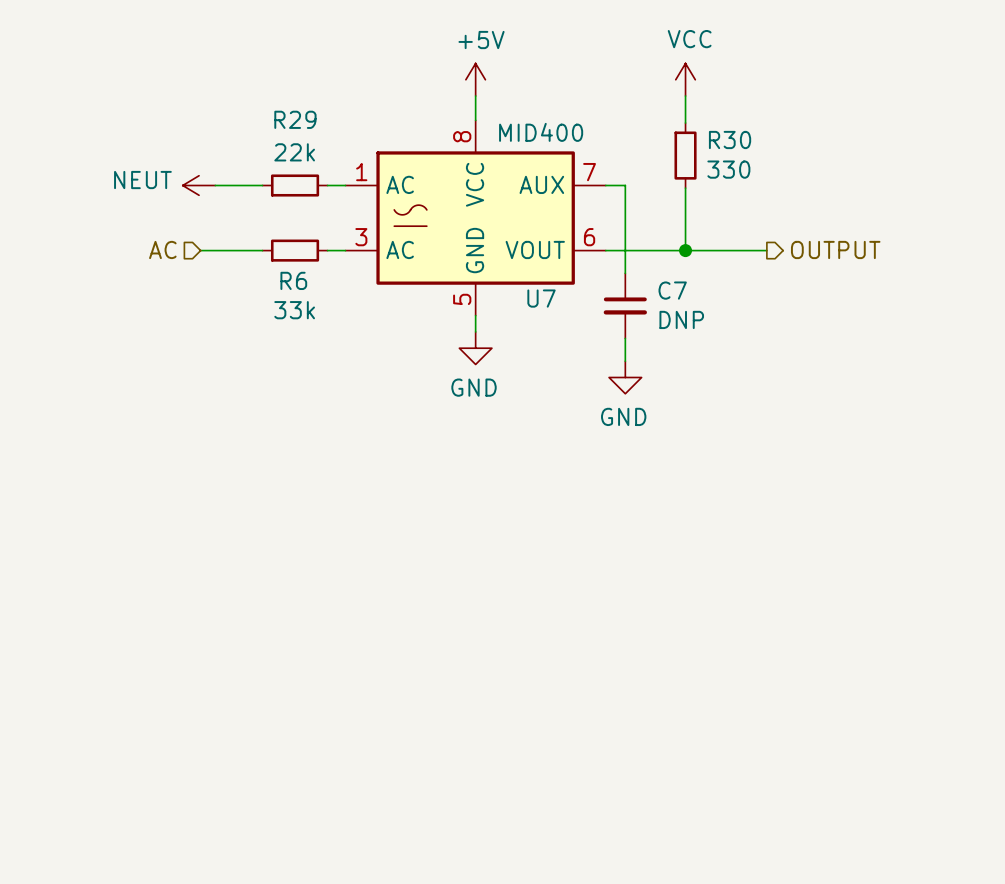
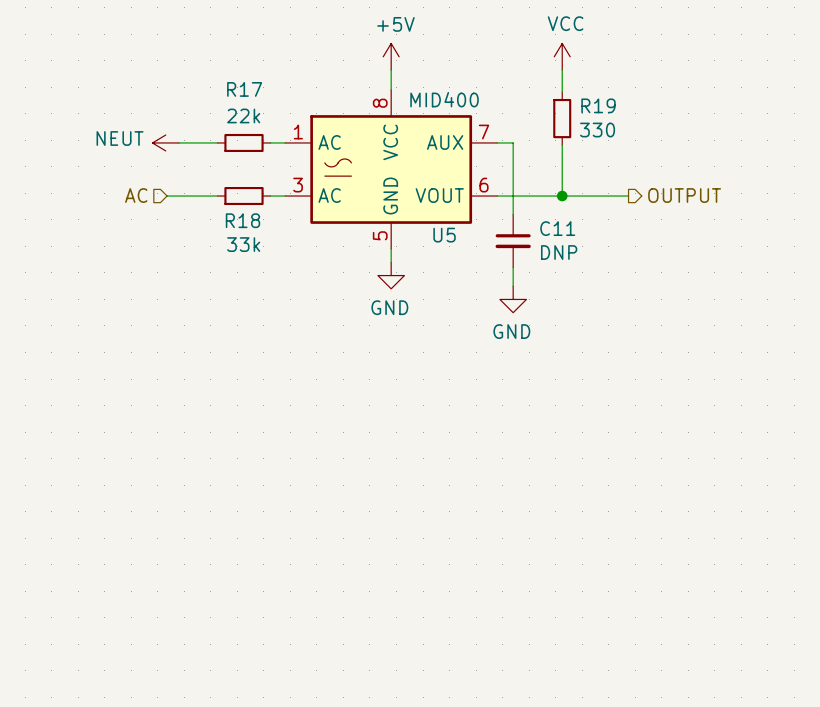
R29 name: R29 (295, 119) -> R17 (244, 89)
R30 name: R30 (730, 139) -> R19 (598, 105)
R6 name: R6 (293, 280) -> R18 (242, 220)
C7 name: C7 (672, 290) -> C11 (557, 228)
U7 name: U7 (541, 298) -> U5 (444, 235)

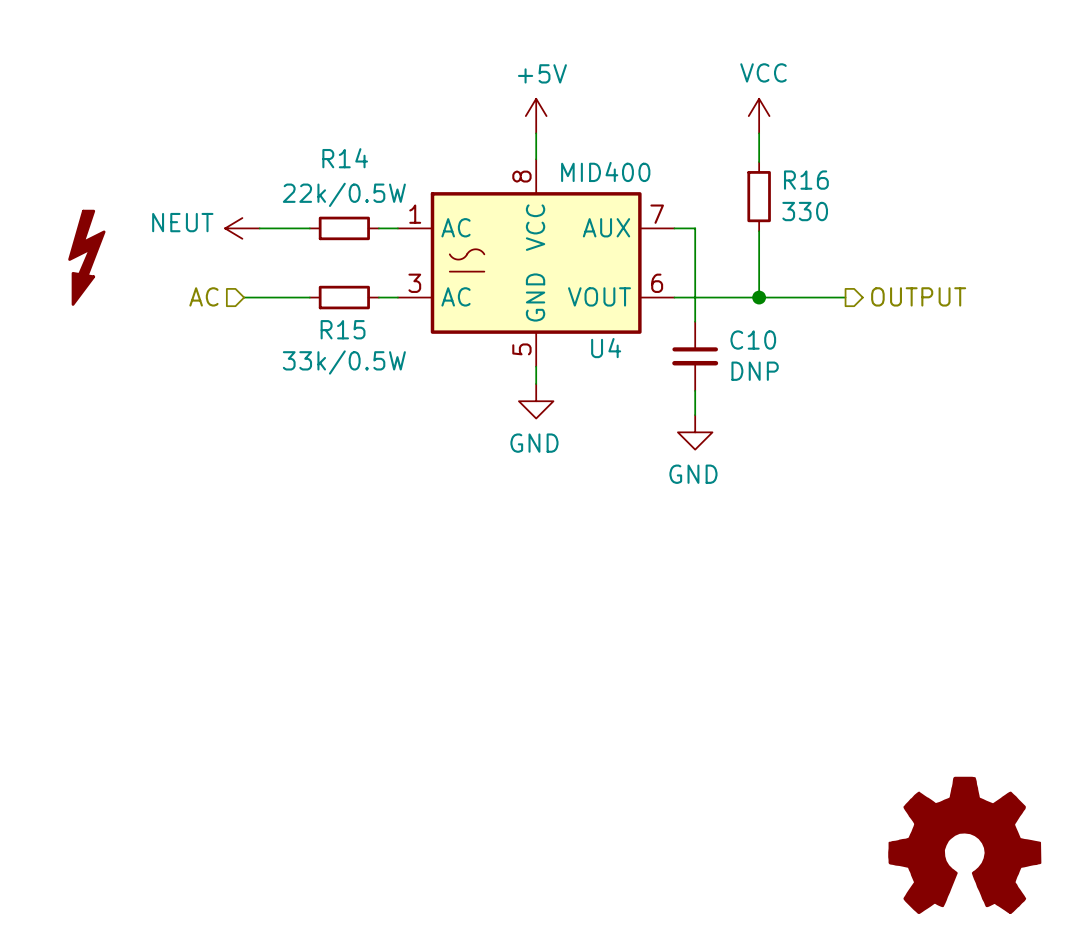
R17 name: R17 (244, 89) -> R14 (345, 158)
R19 name: R19 (598, 105) -> R16 (806, 180)
R17 value: 22k (243, 115) -> 22k/0.5W (344, 194)
power symbol: none -> (86, 257)
R18 name: R18 (242, 220) -> R15 (343, 329)
C11 name: C11 (557, 228) -> C10 (753, 340)
U5 name: U5 (444, 235) -> U4 (606, 348)
R18 value: 33k (243, 244) -> 33k/0.5W (344, 362)
power symbol: none -> (964, 845)

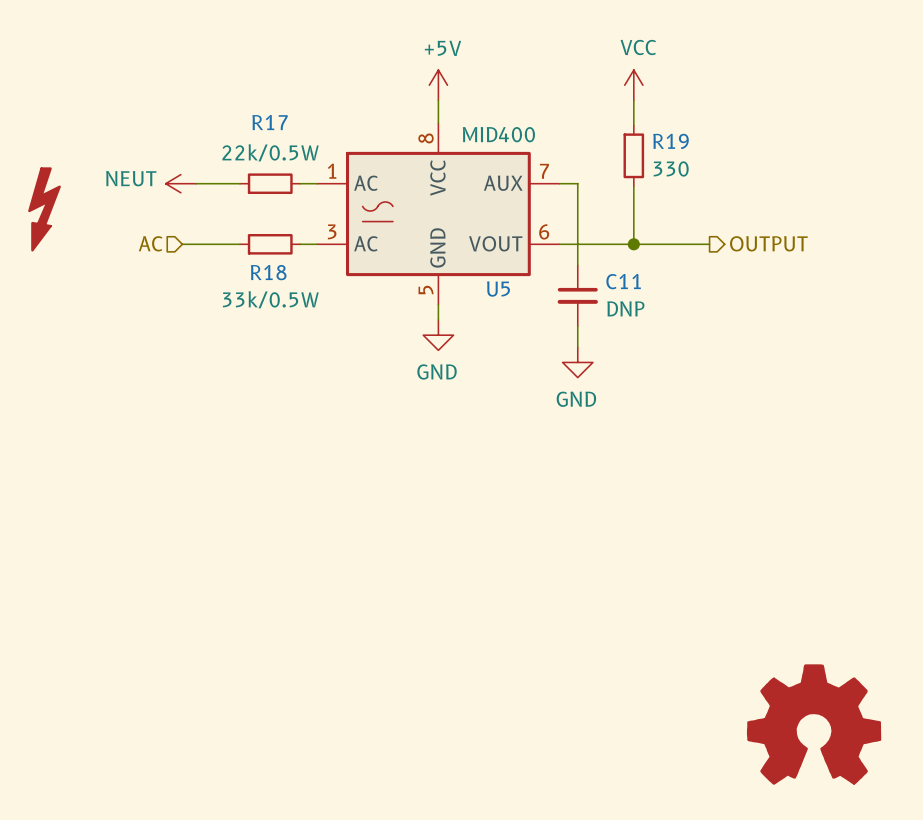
R14 name: R14 (345, 158) -> R17 (270, 122)
R16 name: R16 (806, 180) -> R19 (671, 141)
R15 name: R15 (343, 329) -> R18 (268, 272)
C10 name: C10 (753, 340) -> C11 (623, 281)
U4 name: U4 (606, 348) -> U5 (498, 289)

